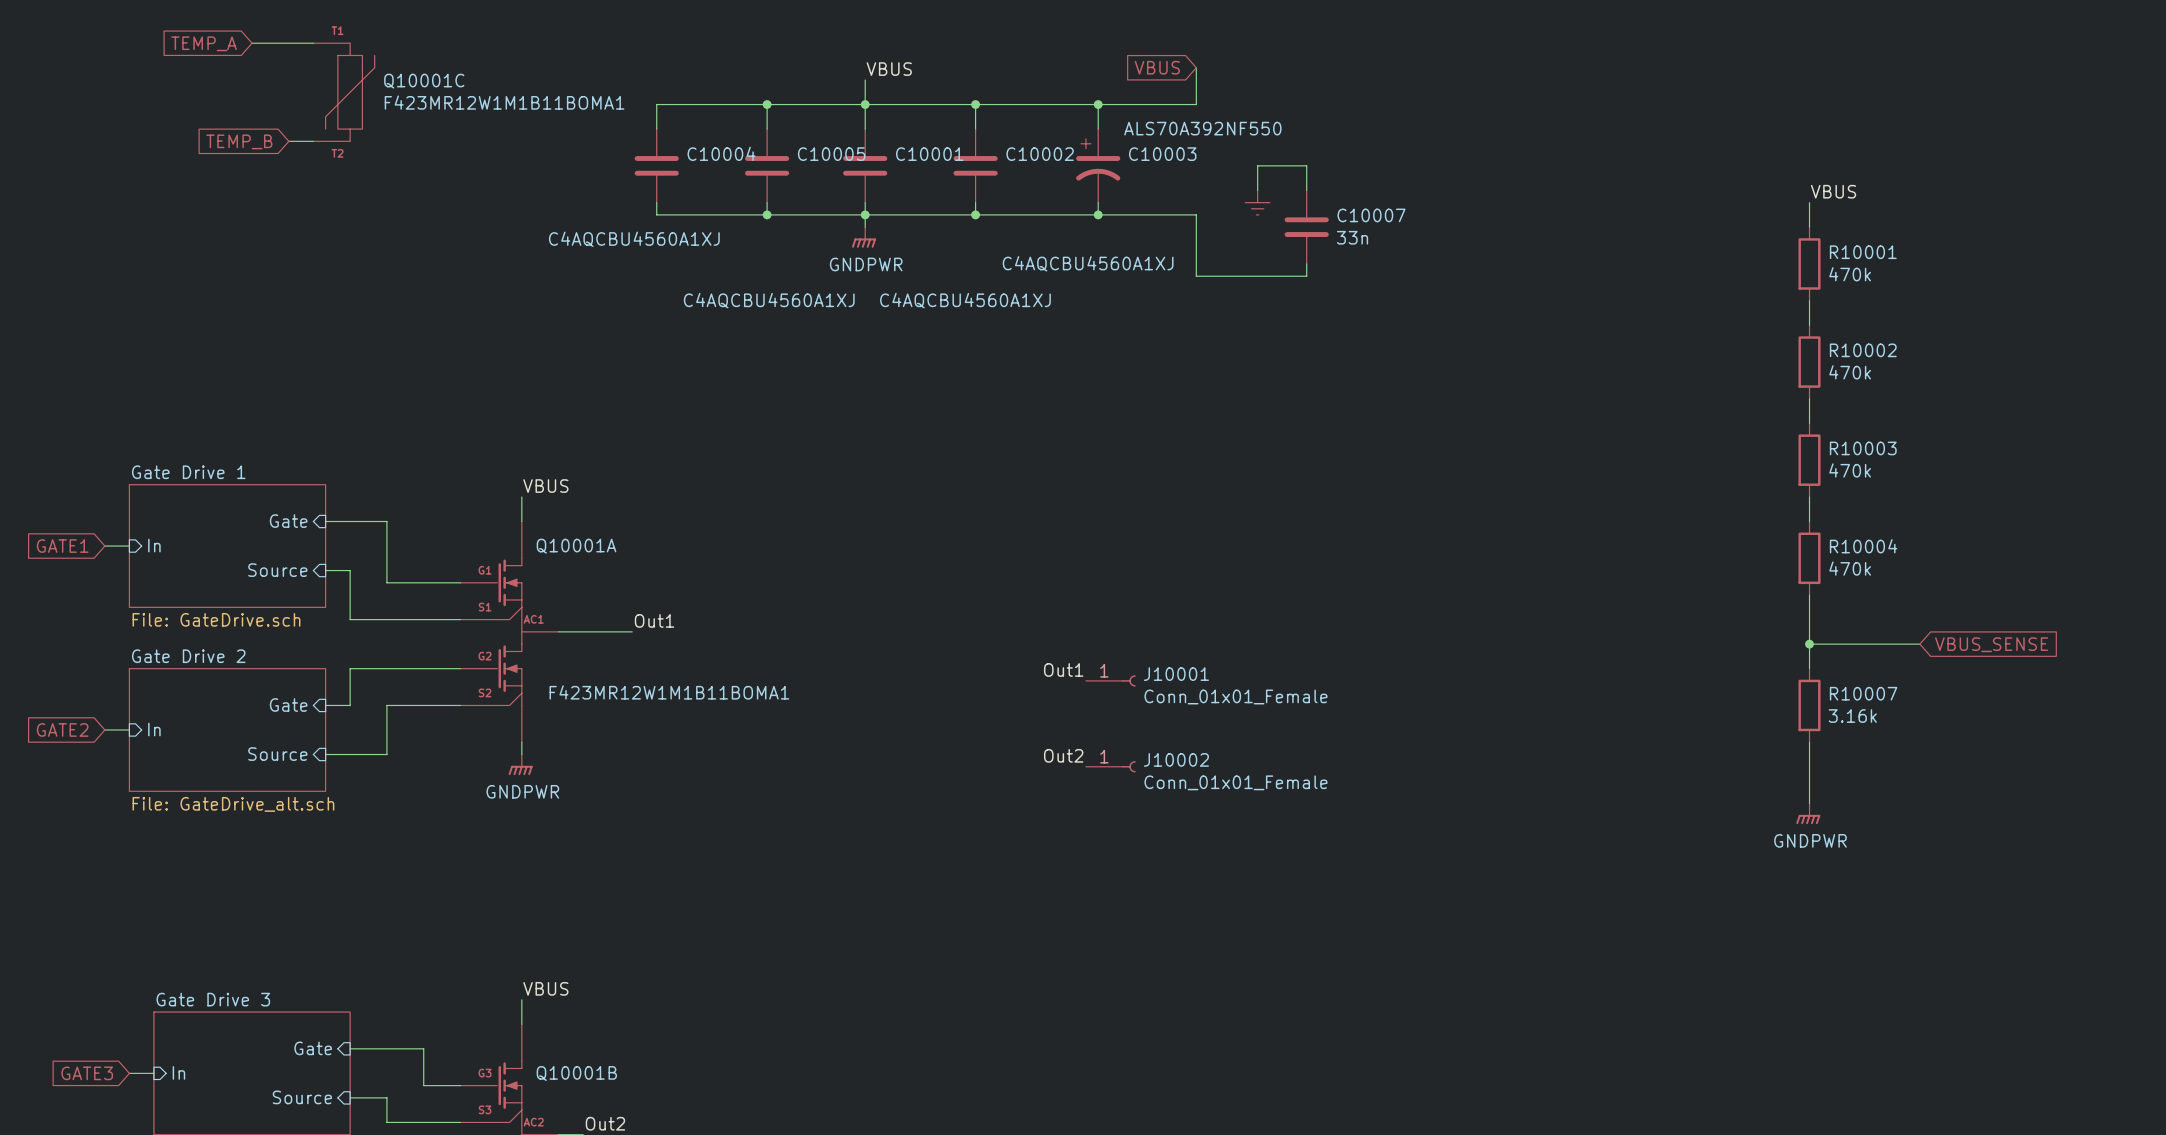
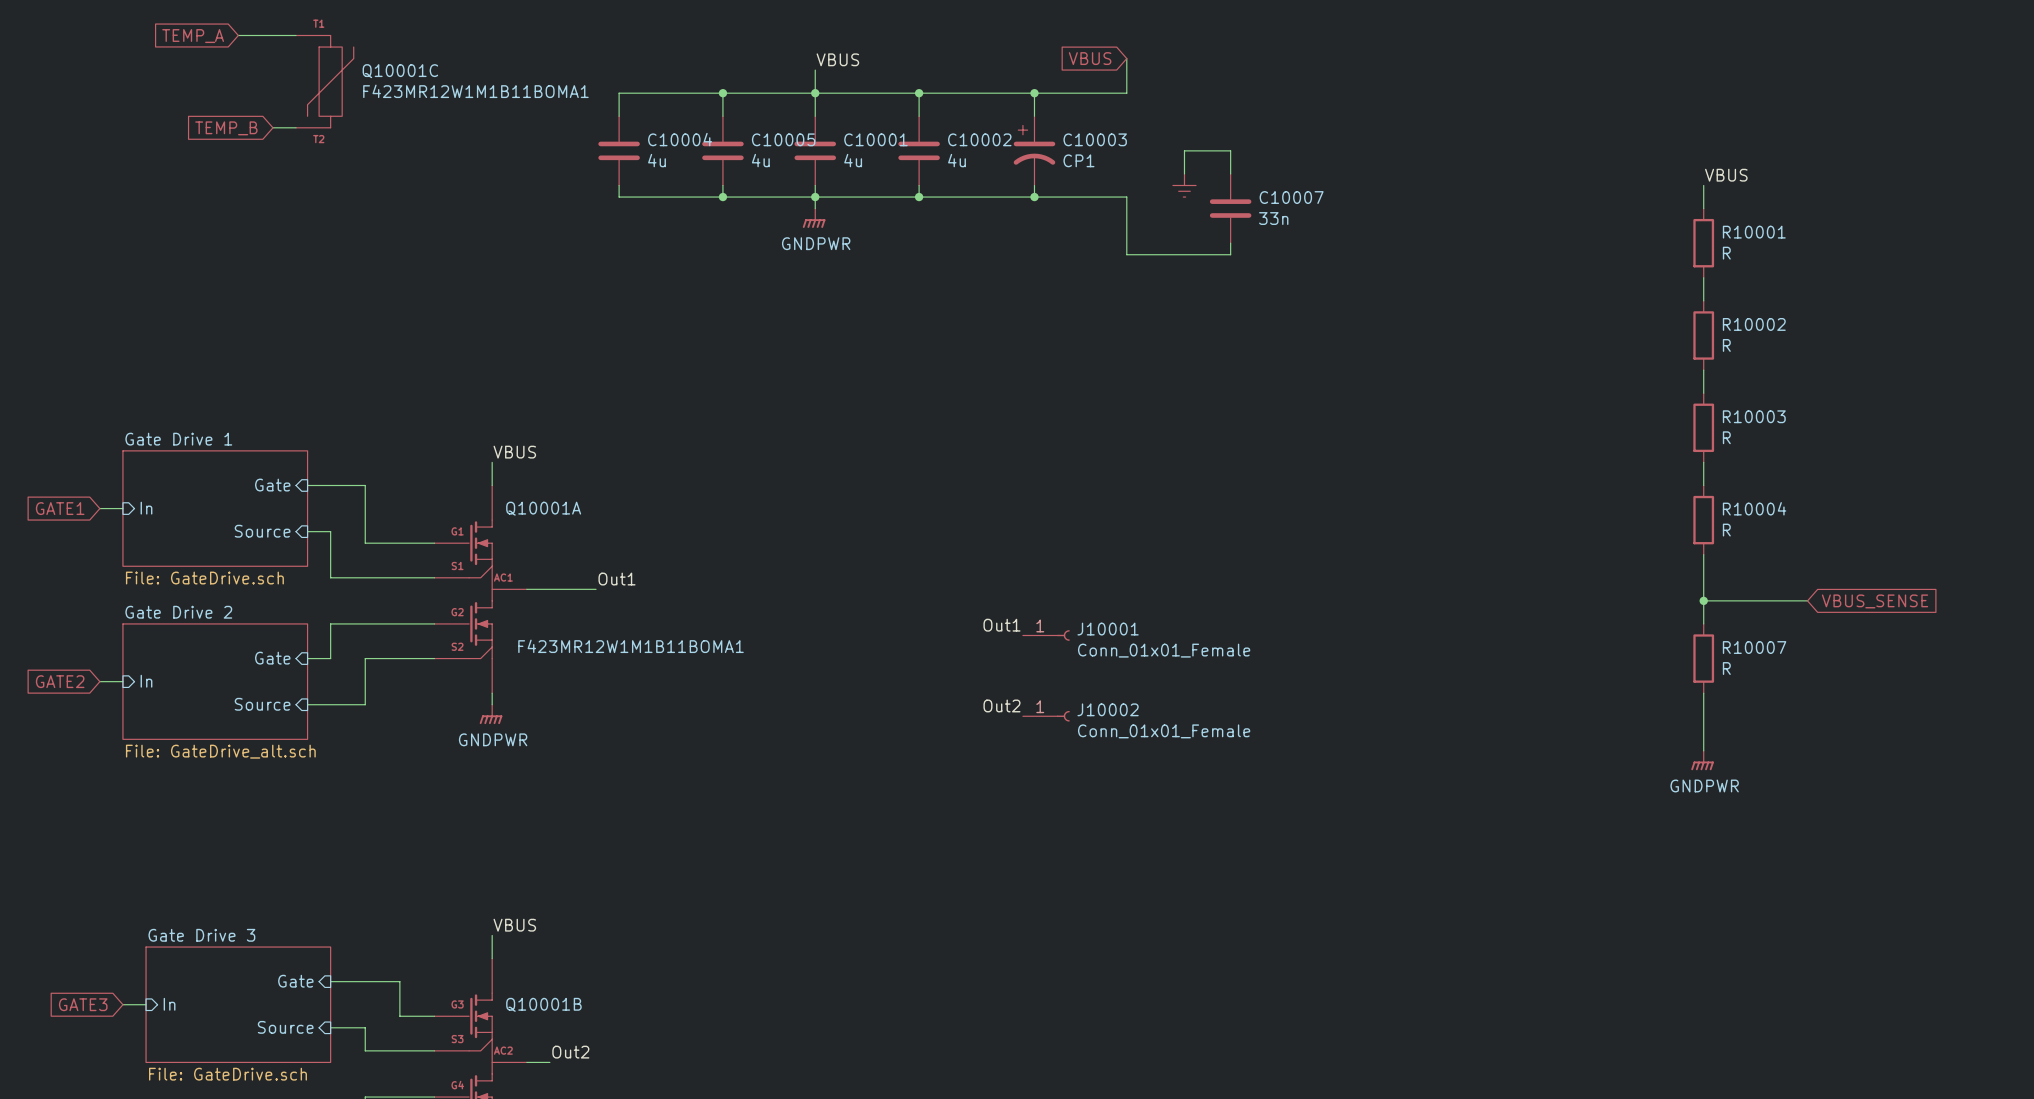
C10003 value: ALS70A392NF550 (1202, 128) -> CP1 (1078, 160)
C10004 value: C4AQCBU4560A1XJ (634, 239) -> 4u (656, 160)
C10002 value: C4AQCBU4560A1XJ (1088, 263) -> 4u (956, 160)
R10001 value: 470k (1850, 274) -> R (1726, 253)
C10005 value: C4AQCBU4560A1XJ (769, 300) -> 4u (760, 160)
C10001 value: C4AQCBU4560A1XJ (965, 300) -> 4u (853, 160)
R10002 value: 470k (1850, 372) -> R (1726, 345)
R10003 value: 470k (1850, 470) -> R (1726, 437)
R10004 value: 470k (1850, 568) -> R (1726, 530)
R10007 value: 3.16k (1852, 716) -> R (1726, 668)

